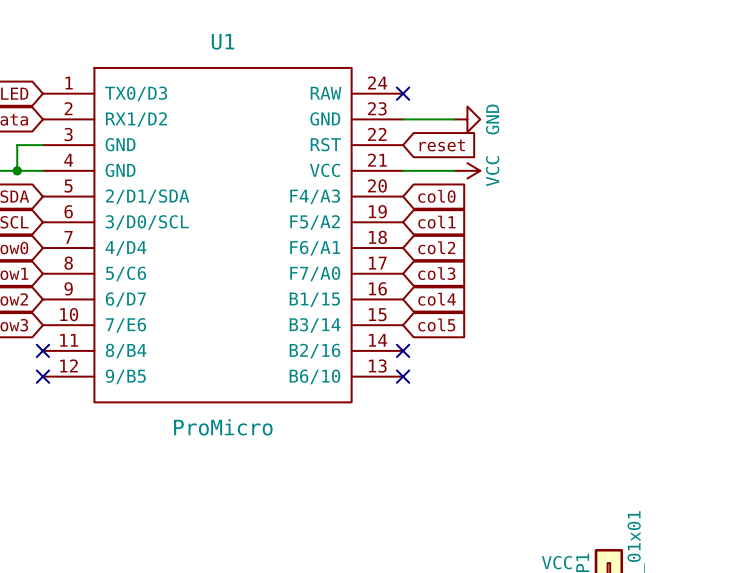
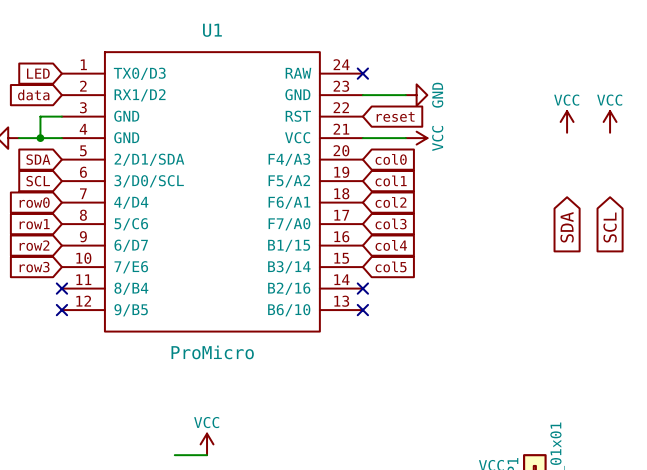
power symbol: none -> VCC (567, 121)
power symbol: none -> VCC (610, 121)
global label: none -> SDA (567, 227)
global label: none -> SCL (610, 227)
power symbol: none -> VCC (207, 444)
wire: none -> (174, 455) (207, 455)

